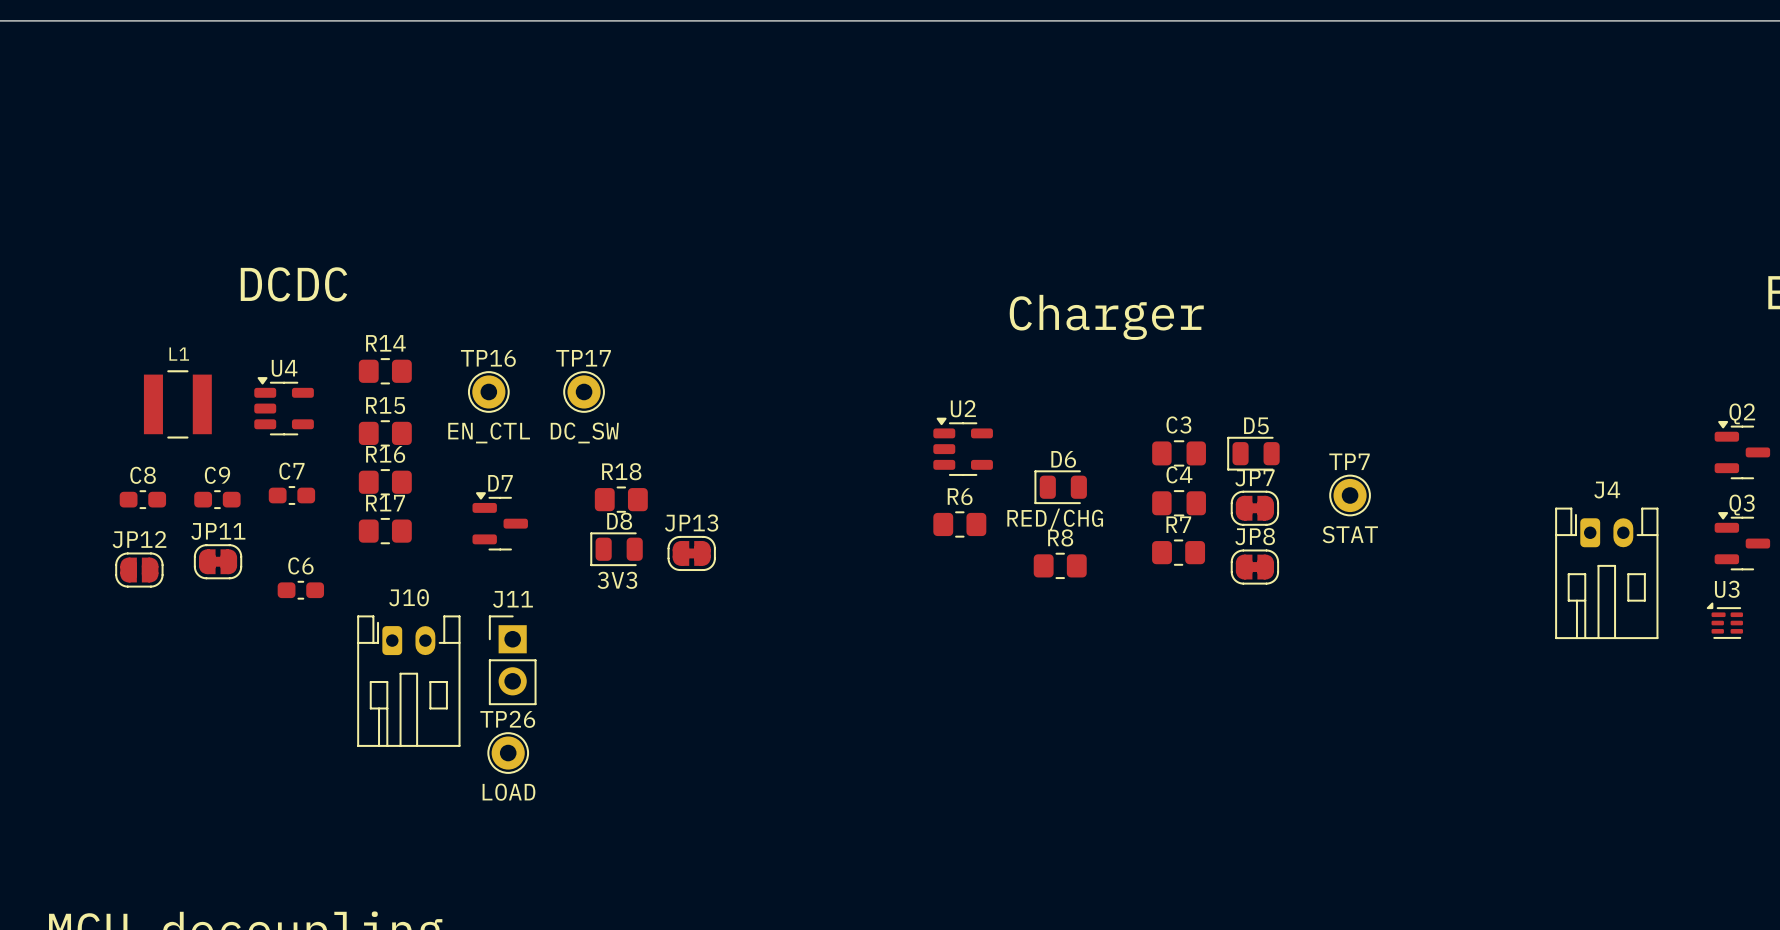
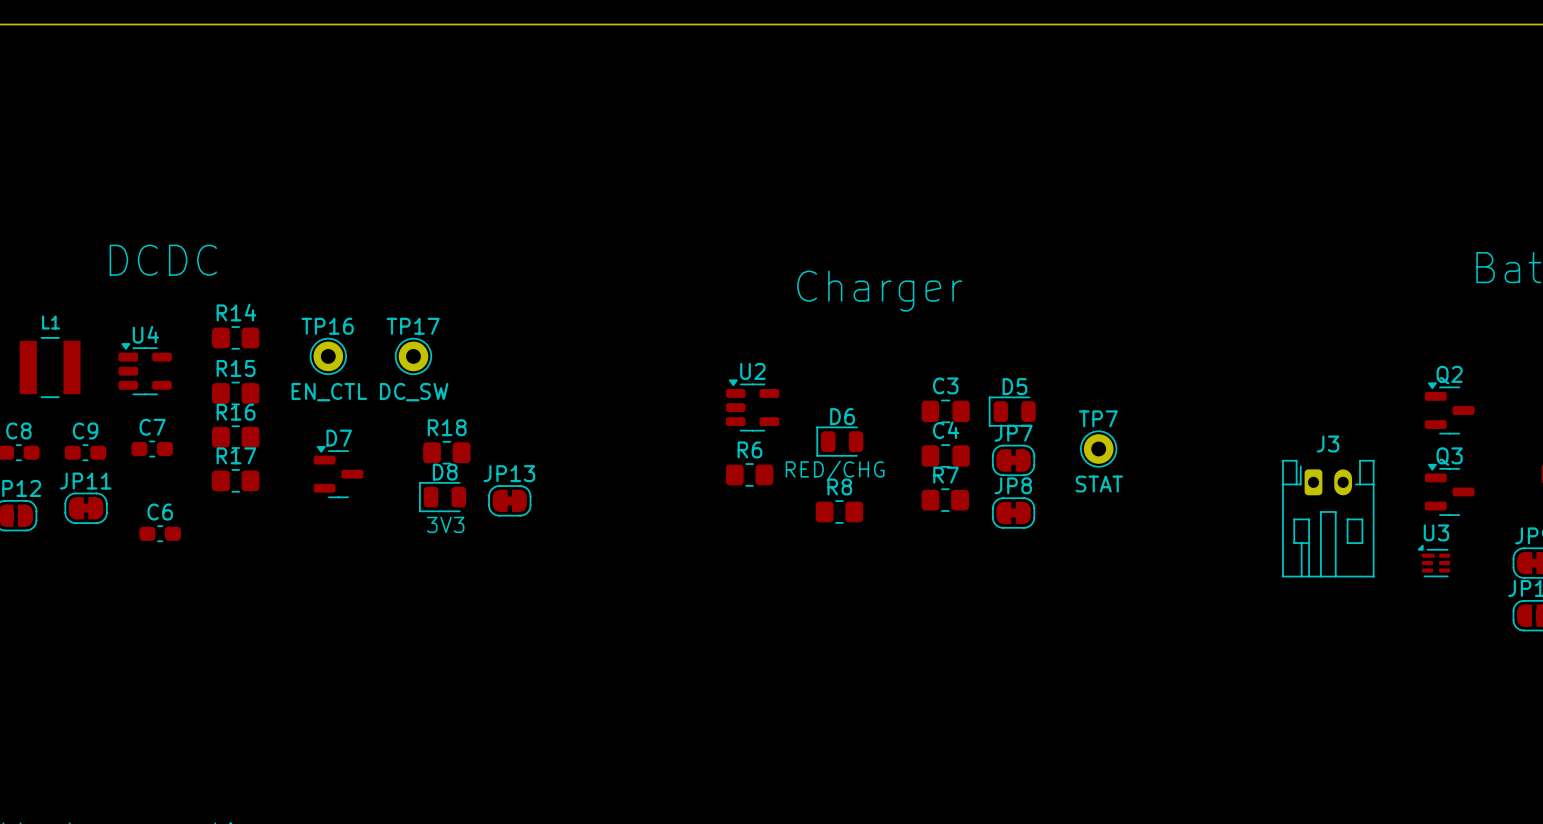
J4 name: J4 (1607, 490) -> J3 (1327, 444)
J11: (512, 660) -> none
J10: (408, 681) -> none
TP26: (508, 753) -> none

